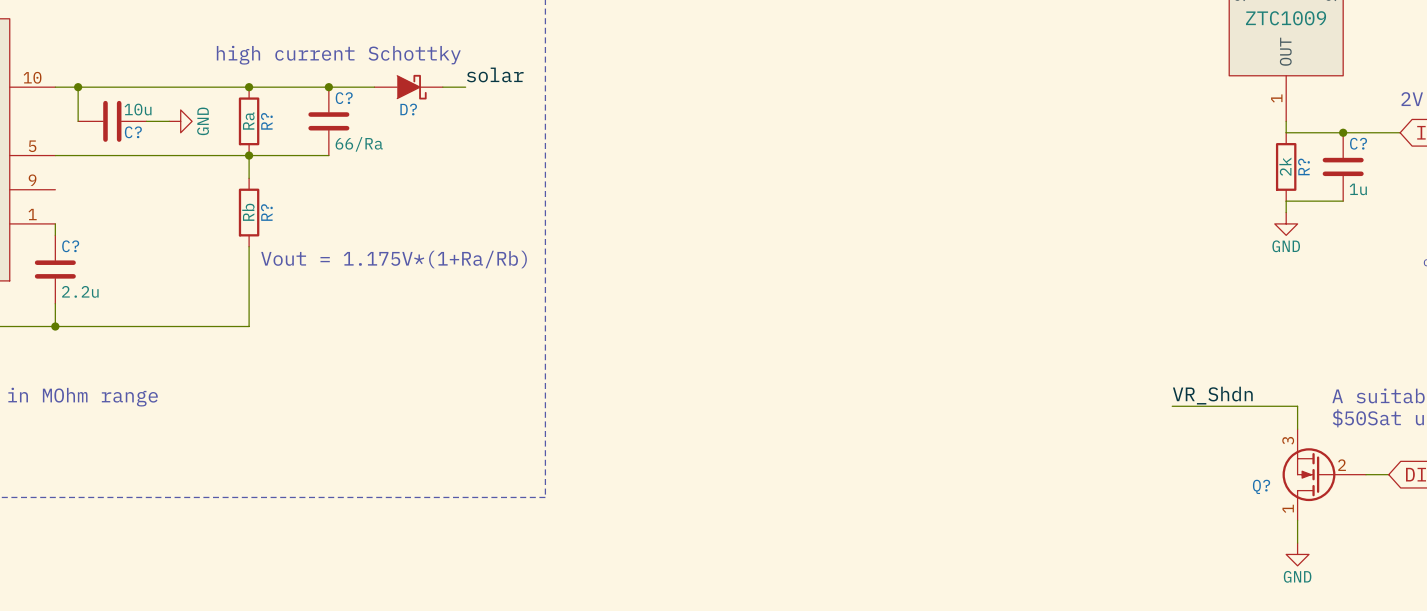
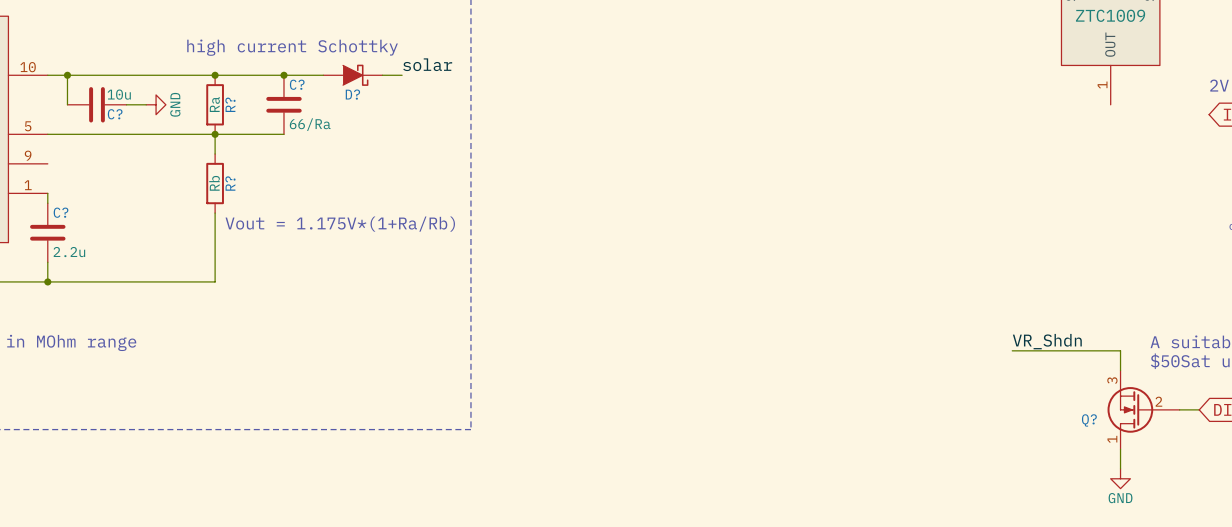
wire: (1286, 121) (1286, 132) (1400, 132) -> none
junction: (1343, 132) -> none
R?: 2k (1286, 166) -> none
C?: 1u (1343, 166) -> none
wire: (1343, 201) (1286, 201) (1286, 212) -> none
power symbol: GND (1286, 223) -> none

